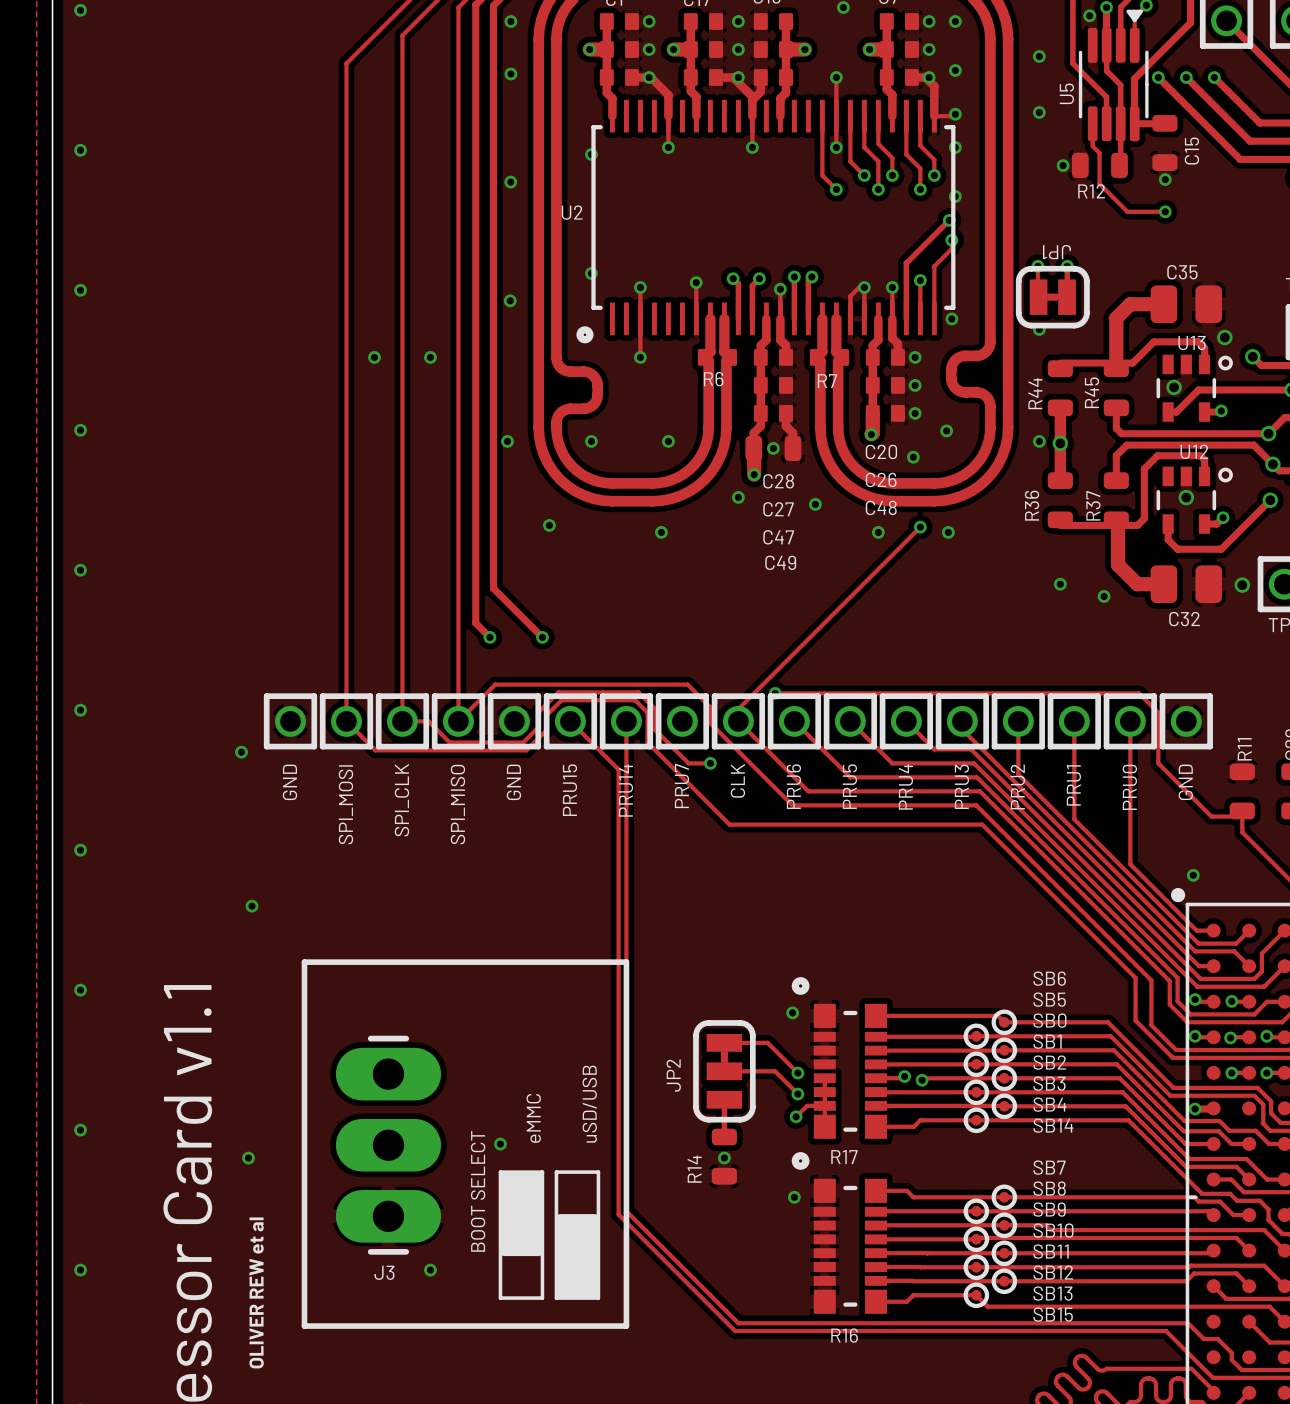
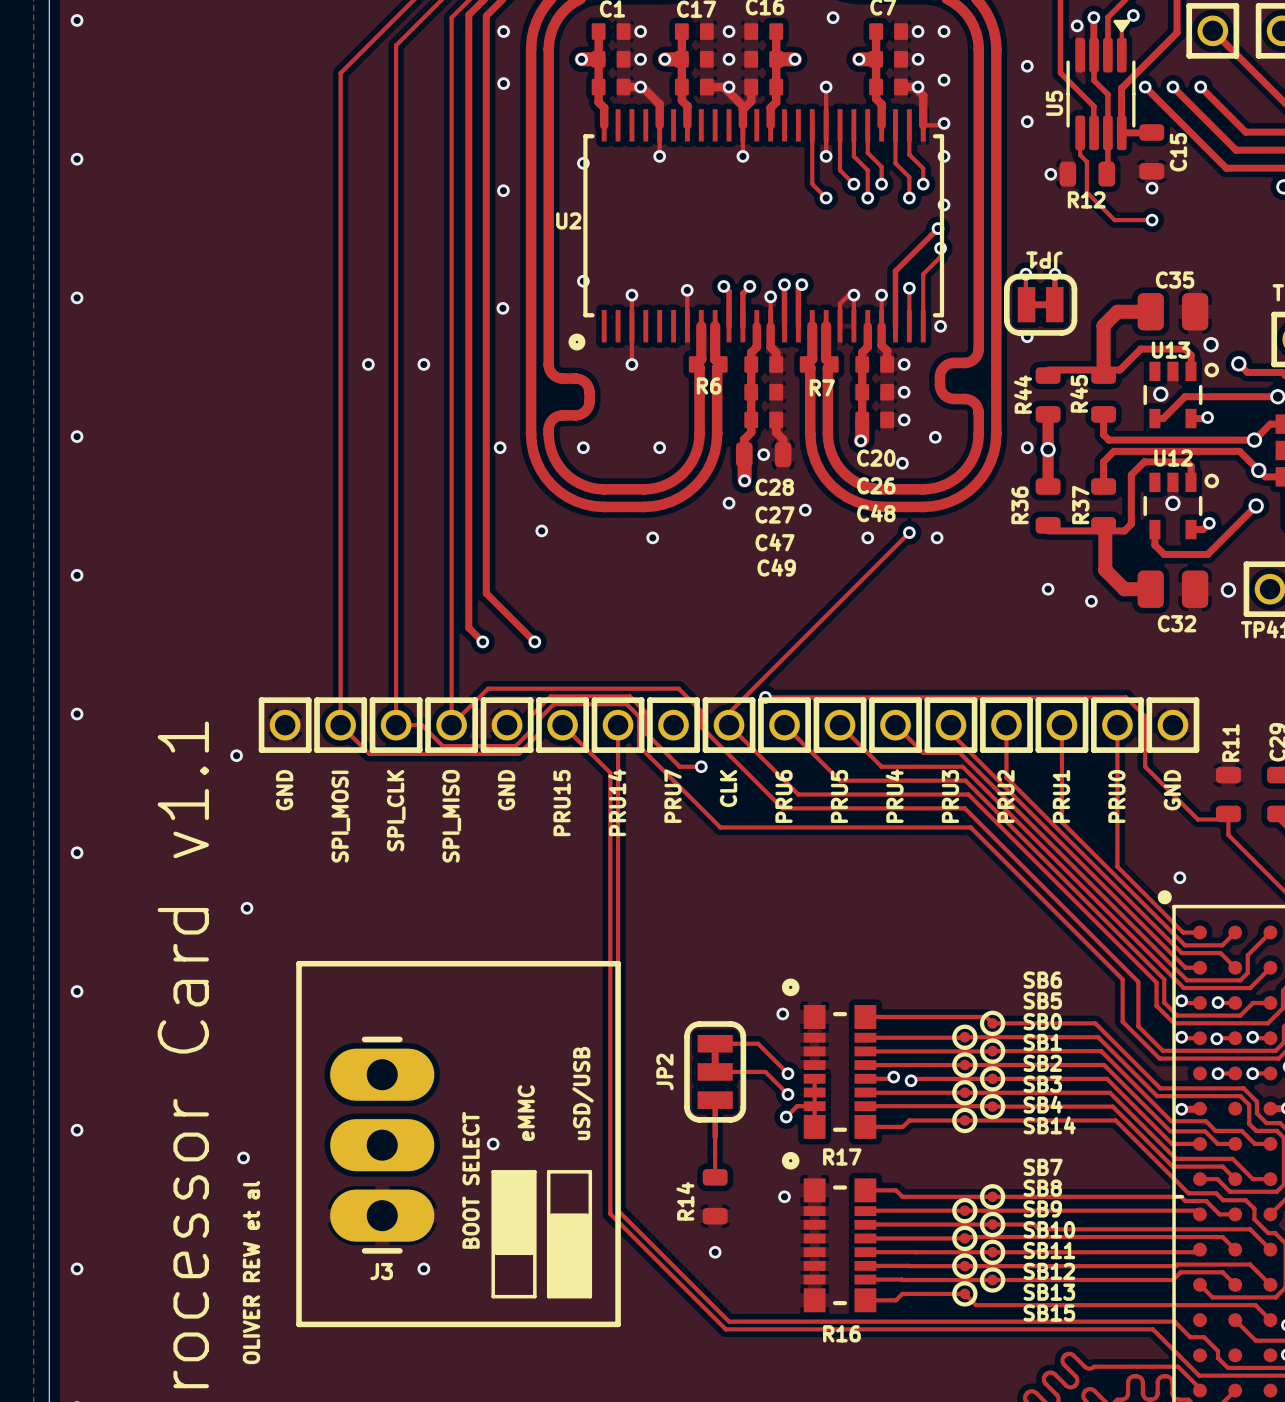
track: none -> (715, 1137) (715, 1171)
R14 position: (724, 1156) -> (715, 1196)
via position: (724, 1158) -> (715, 1252)

